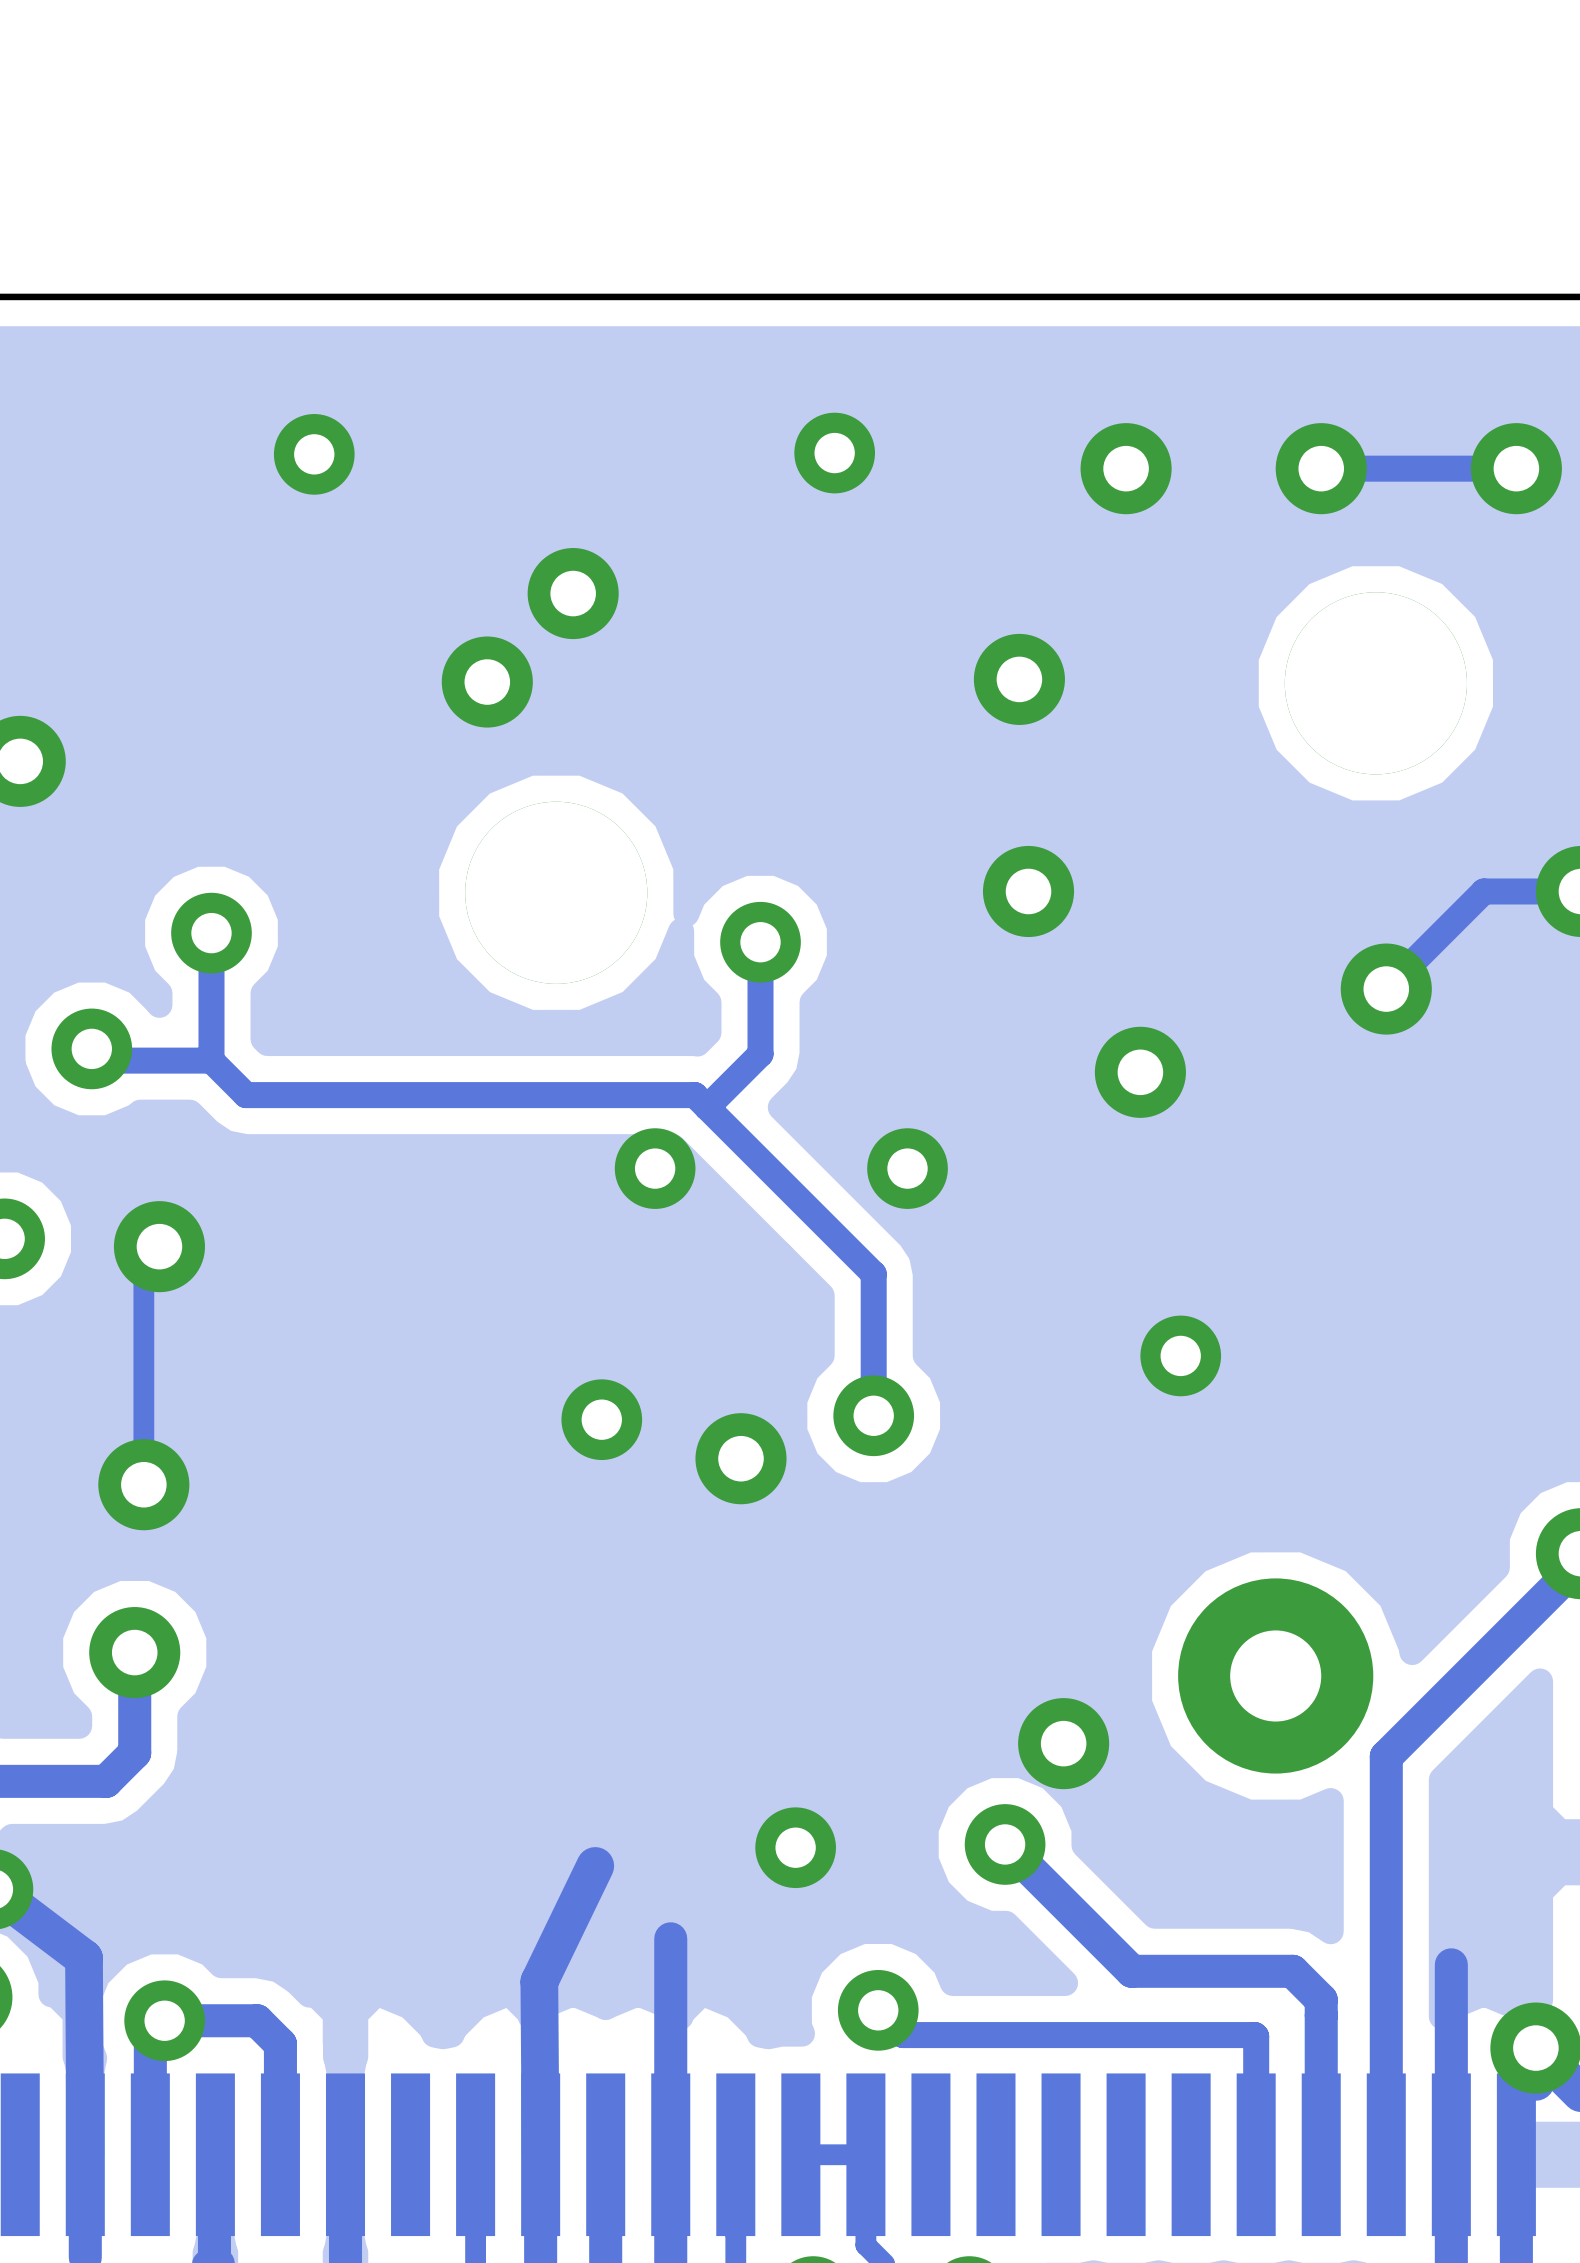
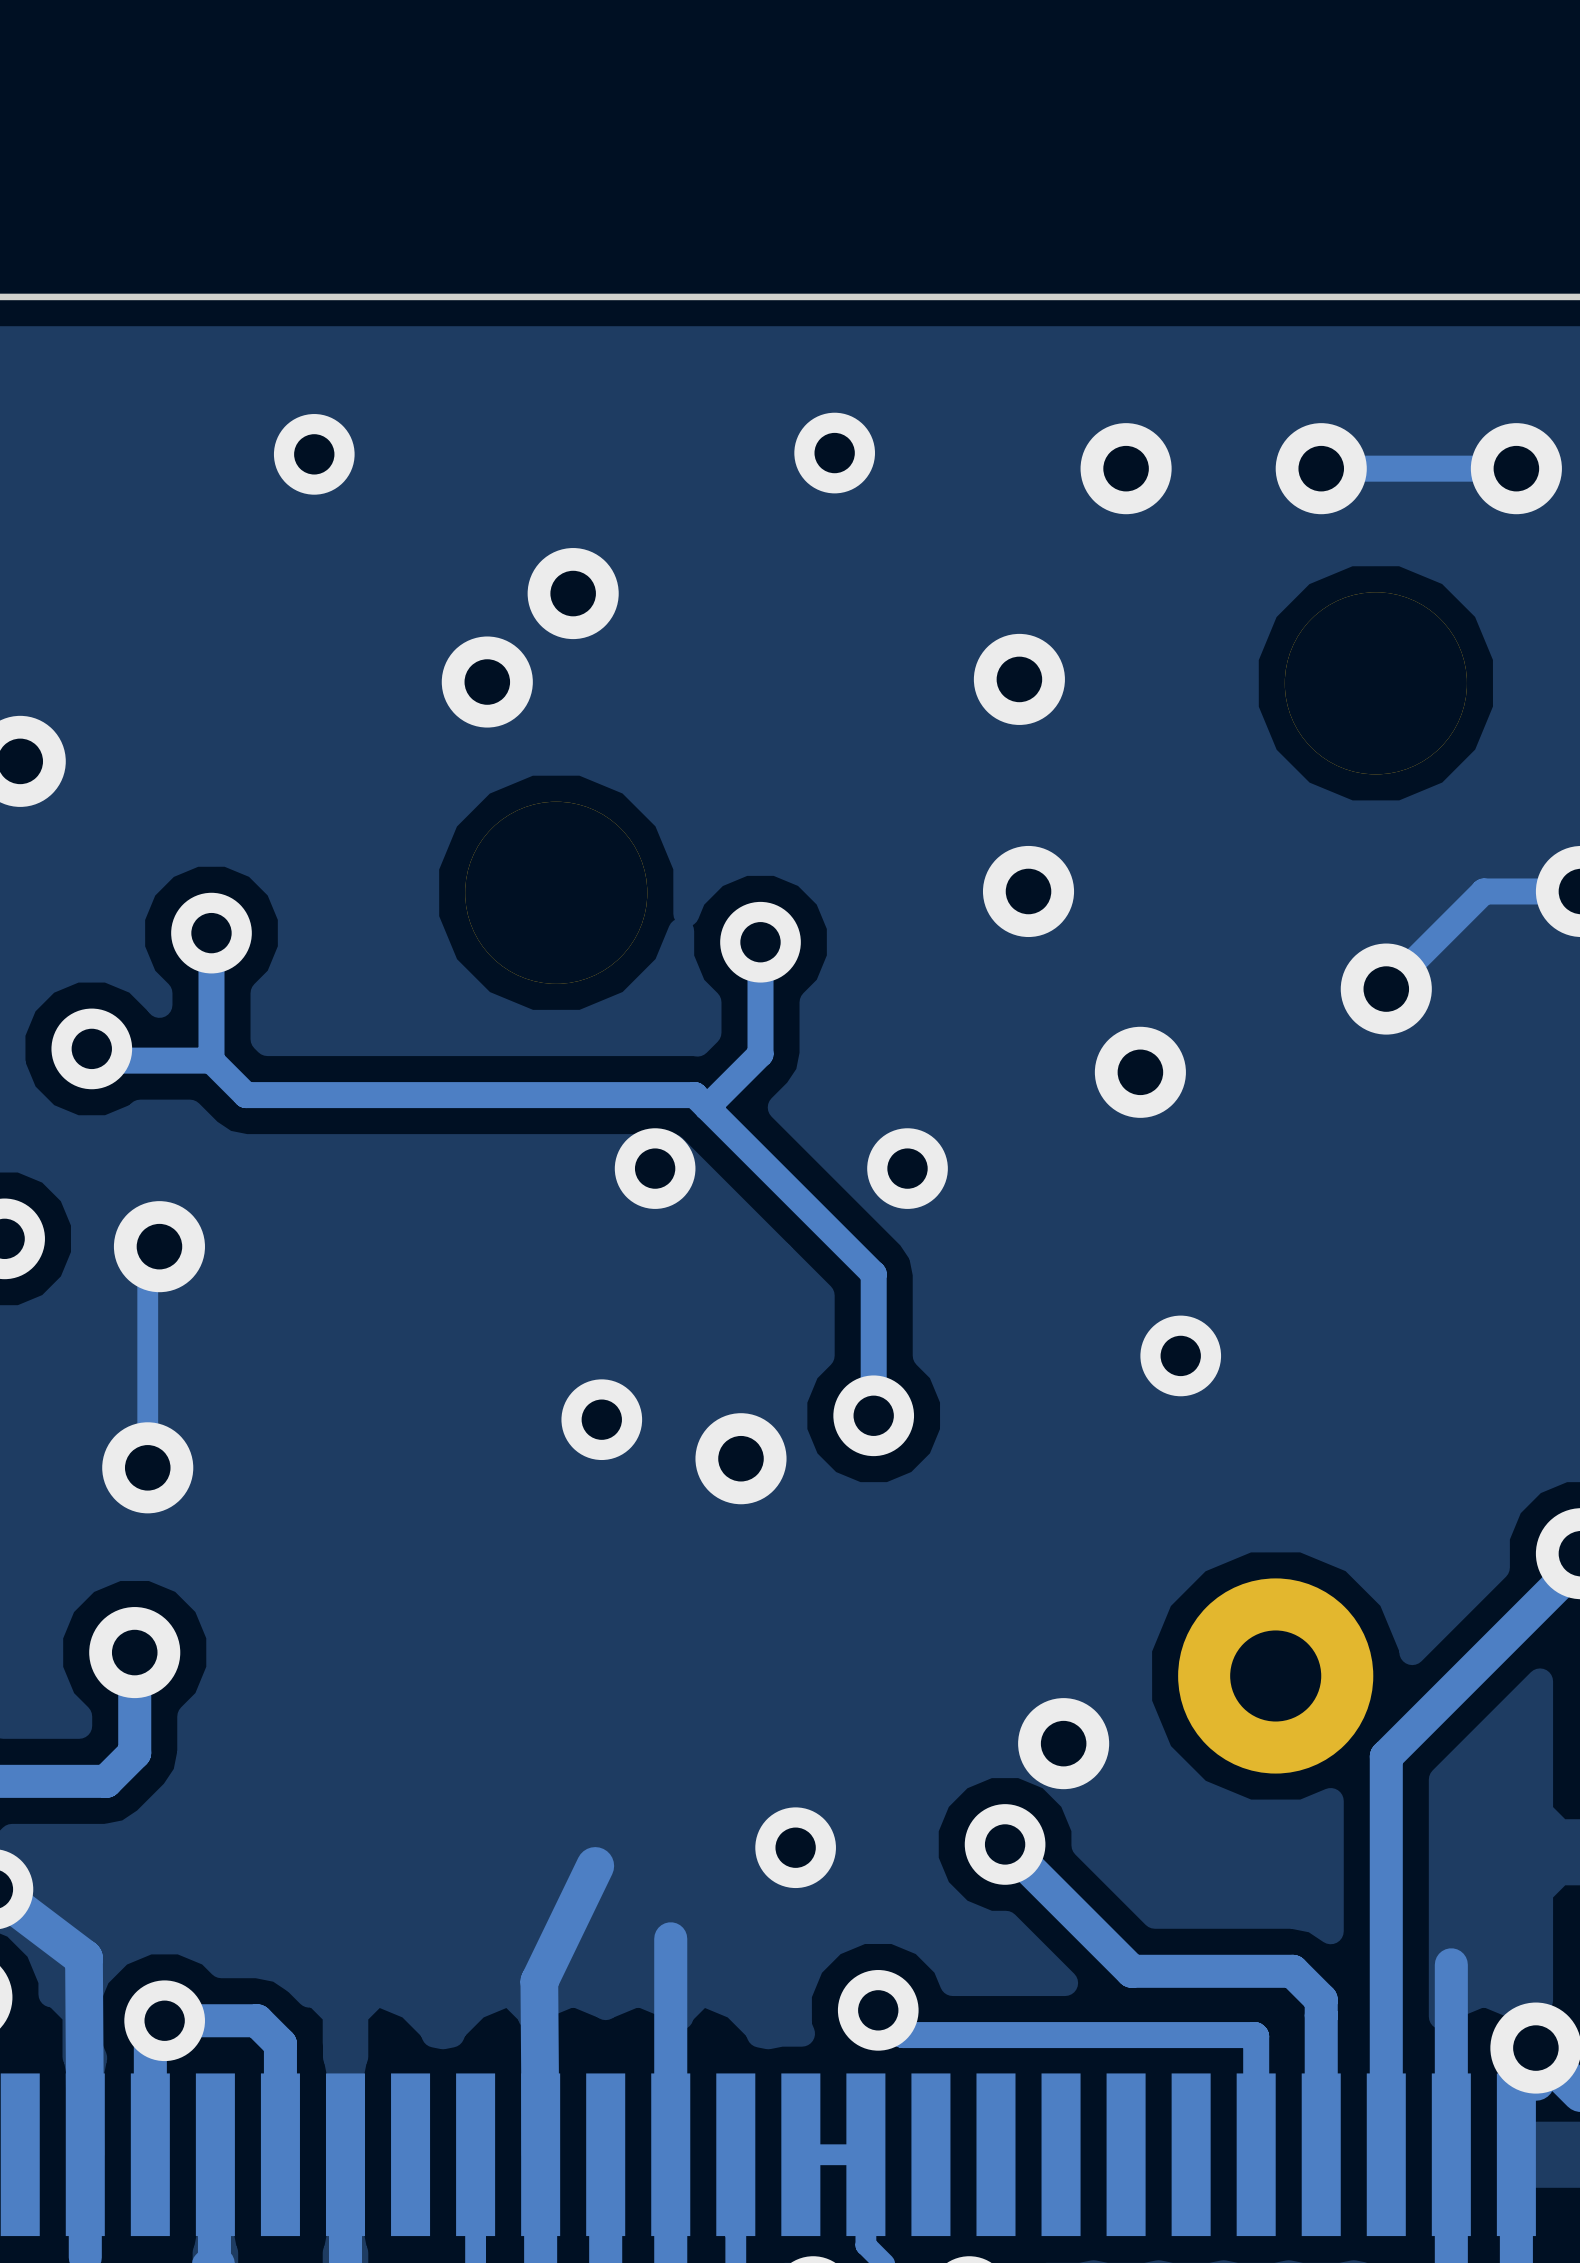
track: (147, 1258) (143, 1262) (143, 1484) -> (147, 1258) (147, 1467)
via position: (143, 1484) -> (147, 1467)

